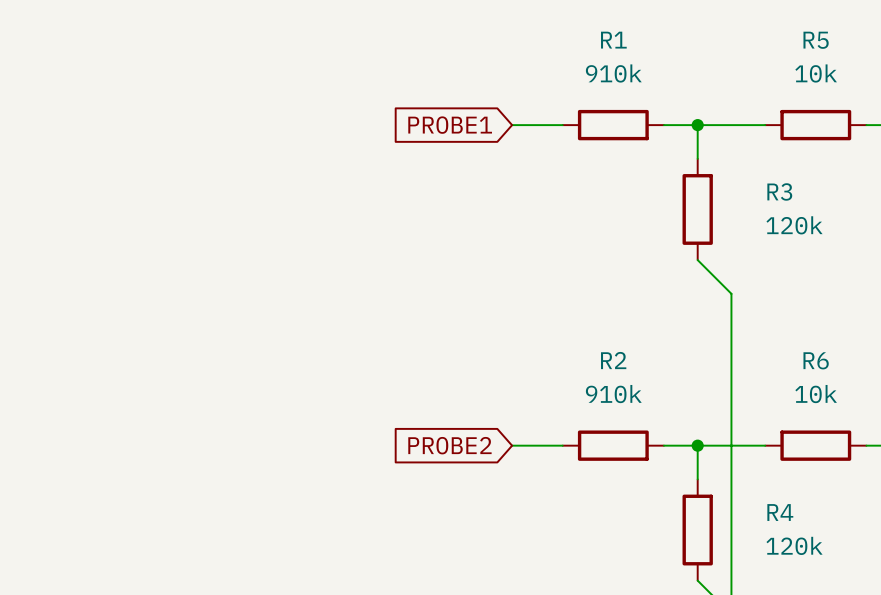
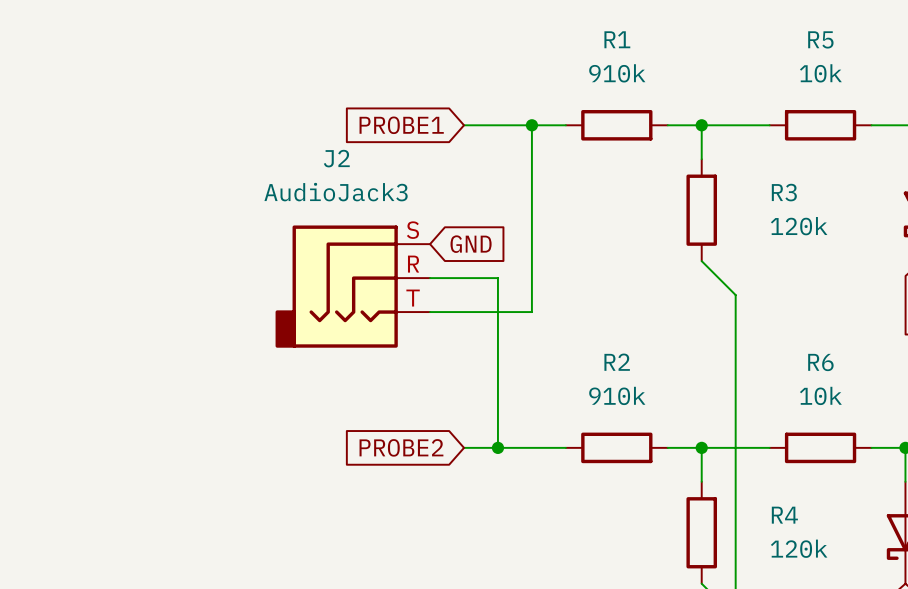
global label position: PROBE1 (450, 125) -> PROBE1 (401, 125)
wire: none -> (464, 125) (514, 125)
wire: none -> (531, 125) (531, 312) (430, 312)
junction: none -> (531, 125)
global label: none -> GND (471, 244)
wire: none -> (430, 278) (497, 278) (497, 447)
J2: none -> AudioJack3 (352, 286)
global label position: PROBE2 (449, 445) -> PROBE2 (401, 447)
wire: none -> (464, 447) (514, 447)
junction: none -> (497, 447)

